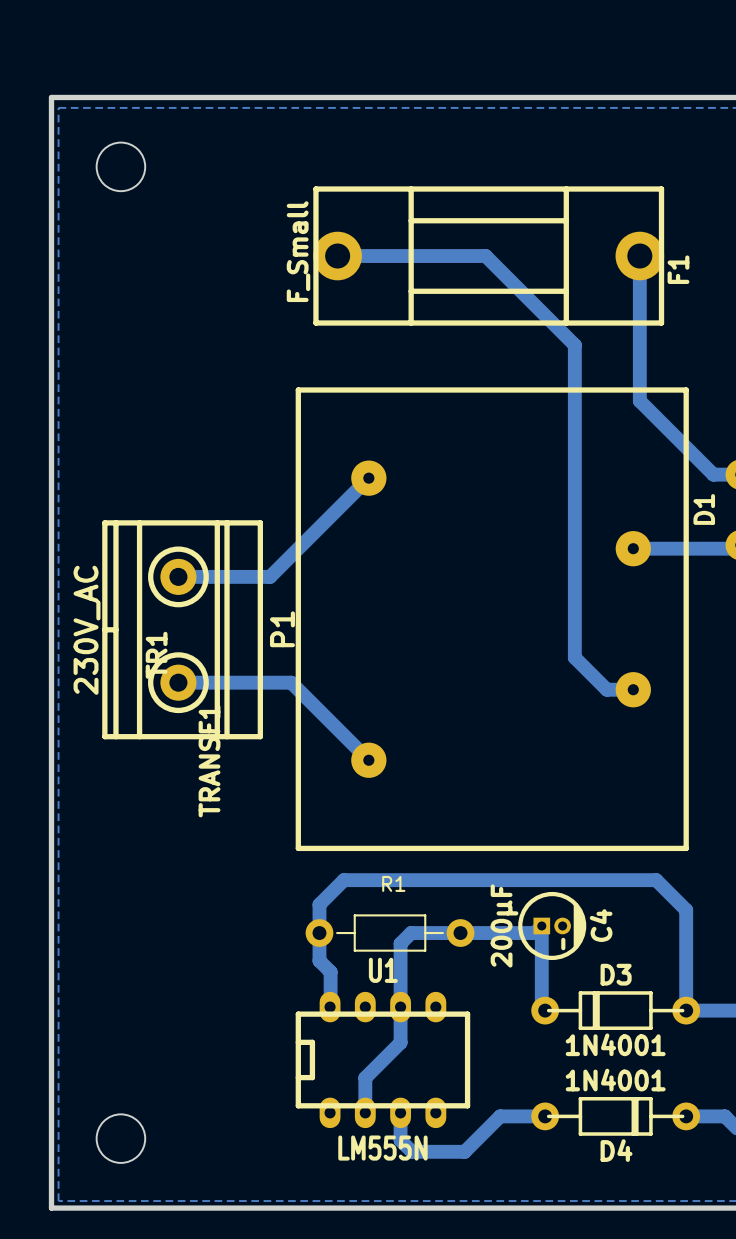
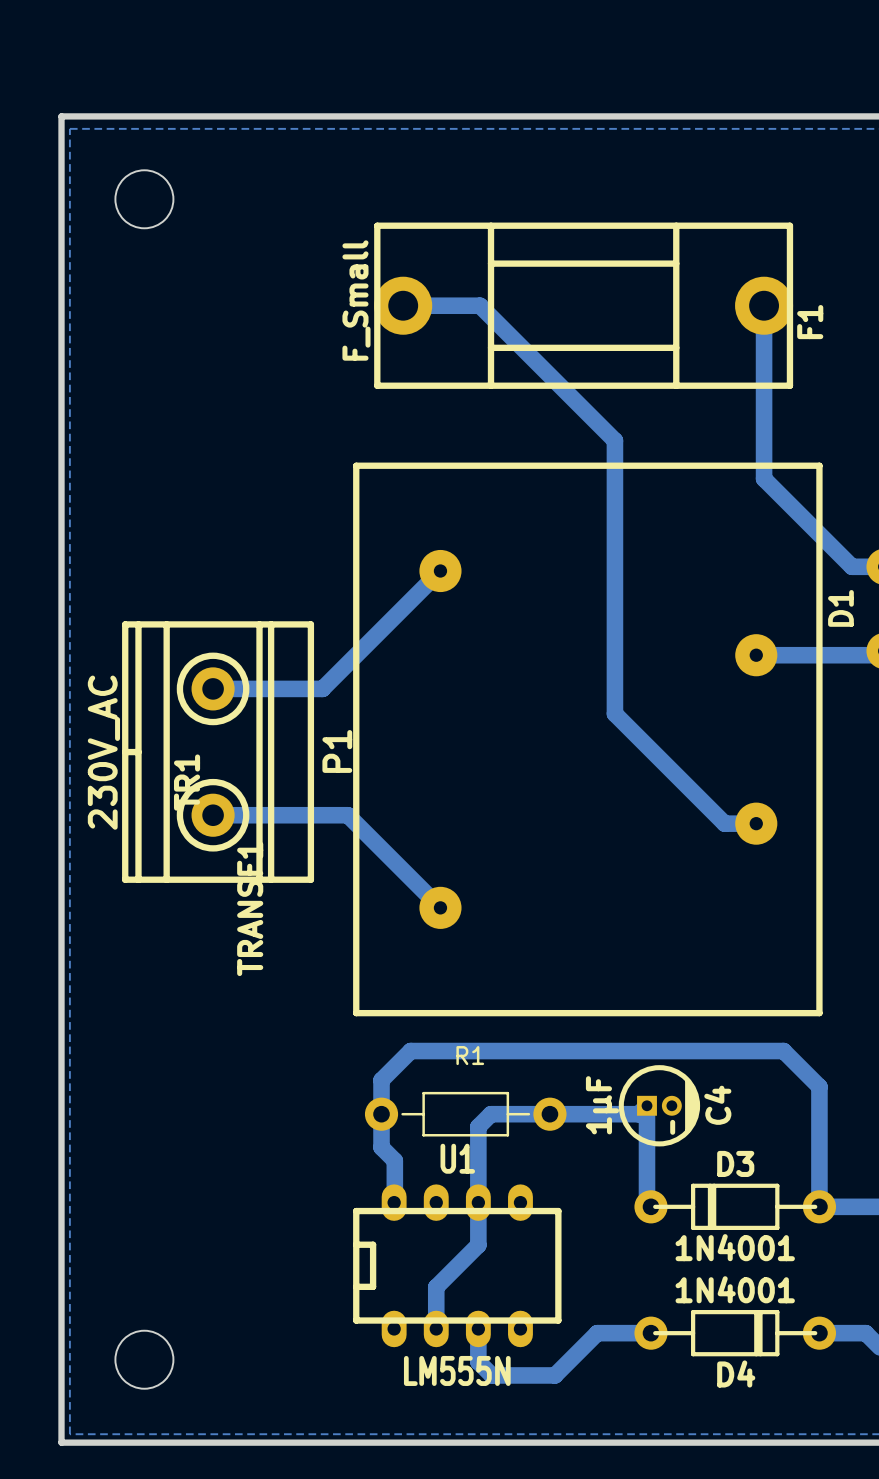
bottom track: (401, 256) (485, 256) (574, 345) (574, 657) -> (480, 305) (614, 440) (614, 713) (686, 785)
C4 value: 200µF (504, 925) -> 1µF (602, 1105)

